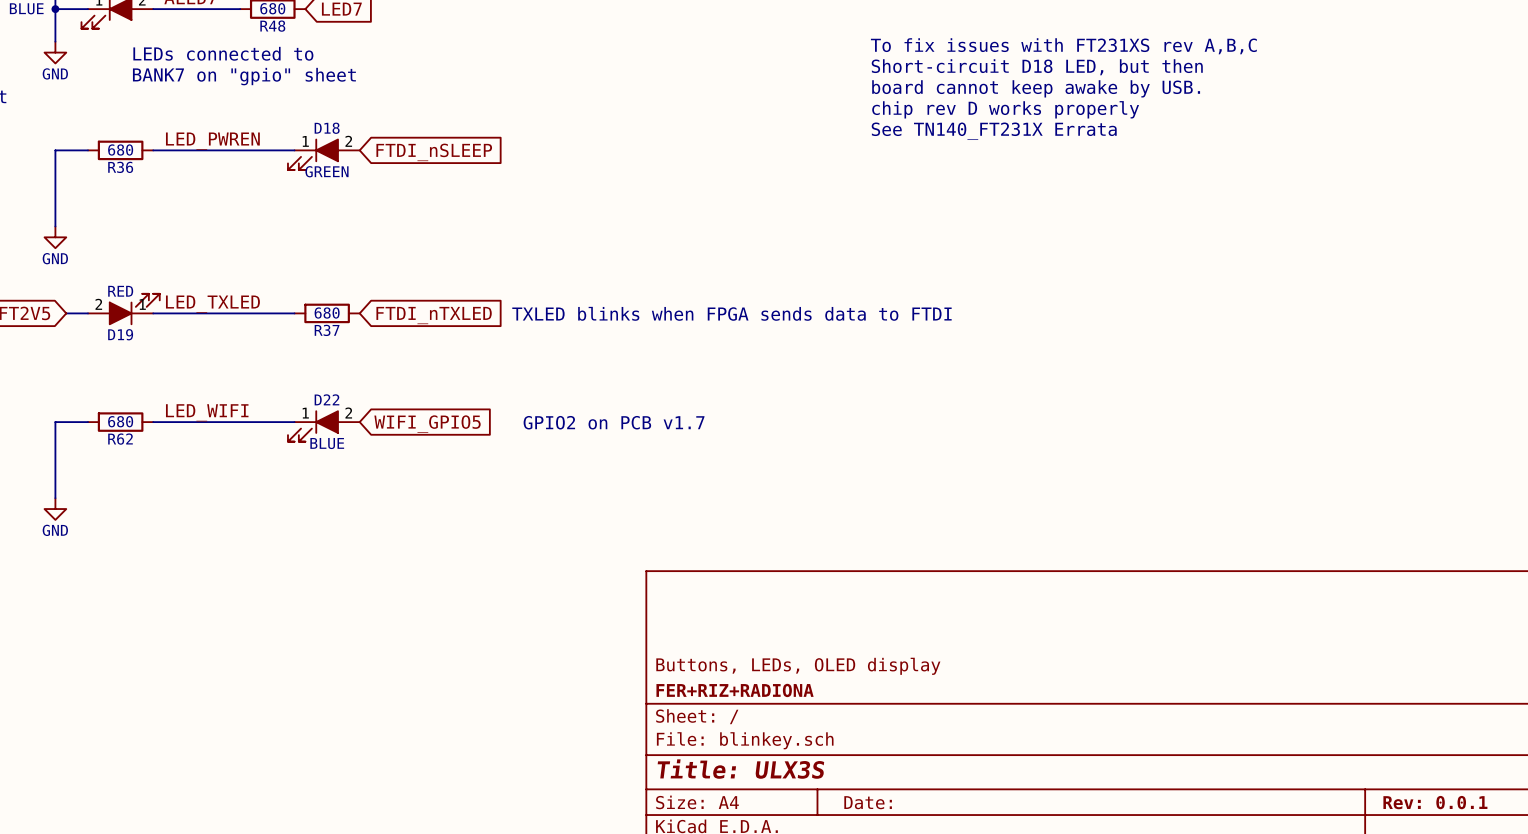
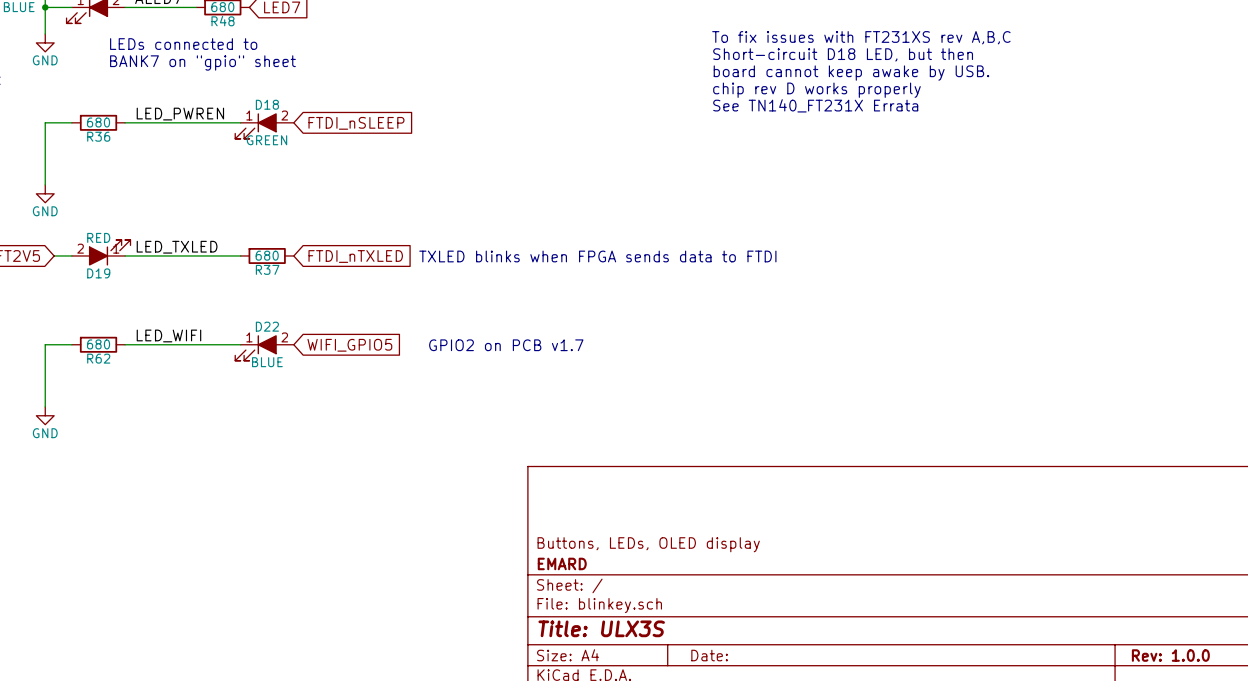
title block: FER+RIZ+RADIONA (735, 690) -> EMARD (562, 563)
title block: Rev: 0.0.1 (1435, 802) -> Rev: 1.0.0 (1170, 655)

